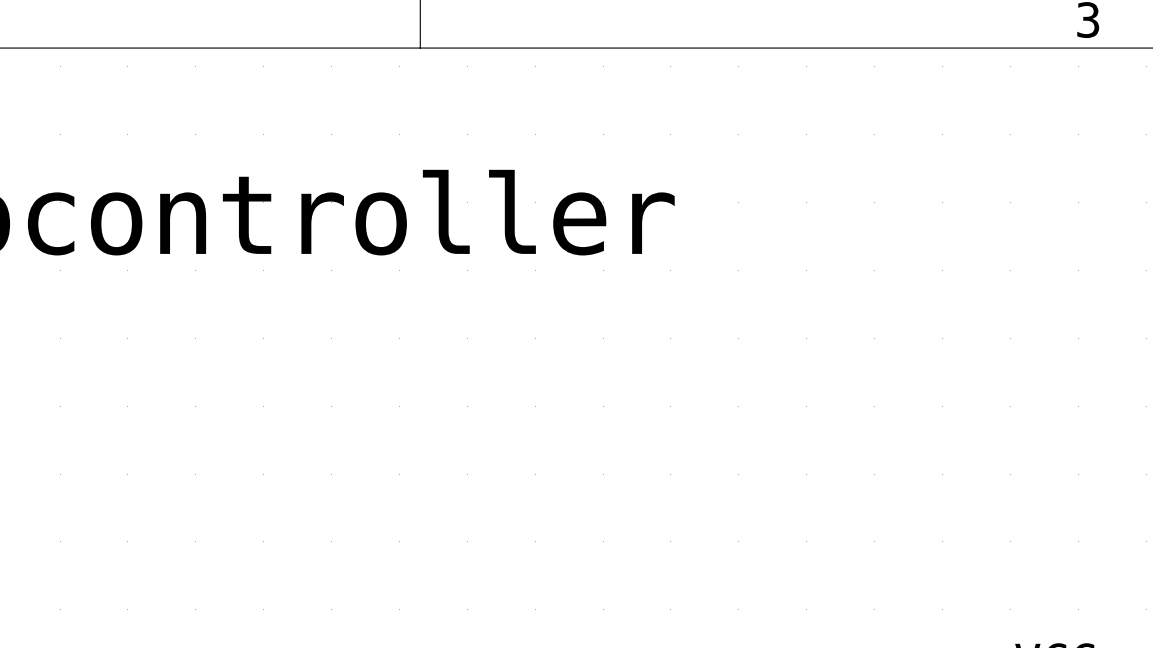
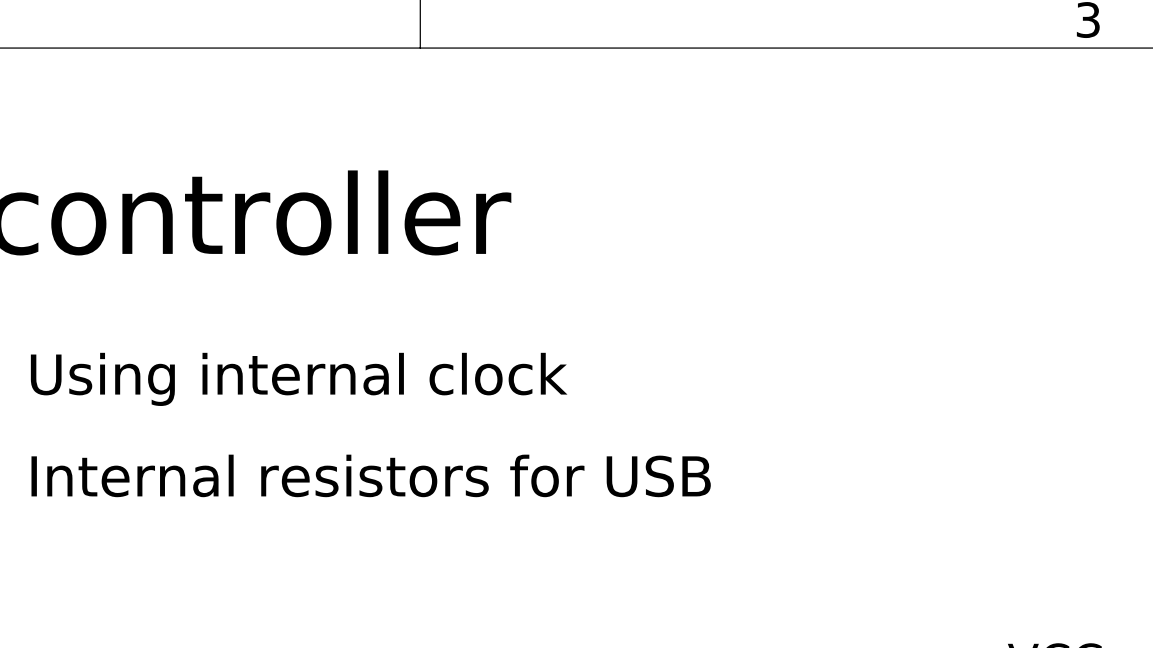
text: none -> Using internal clock (299, 379)
text: none -> Internal resistors for USB (371, 475)

